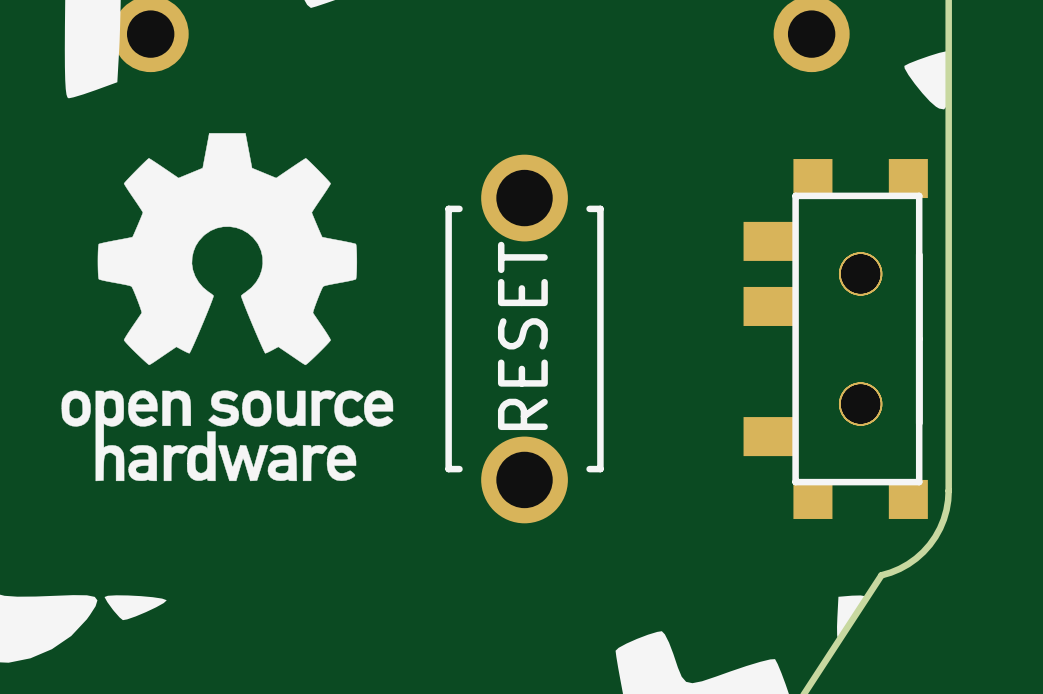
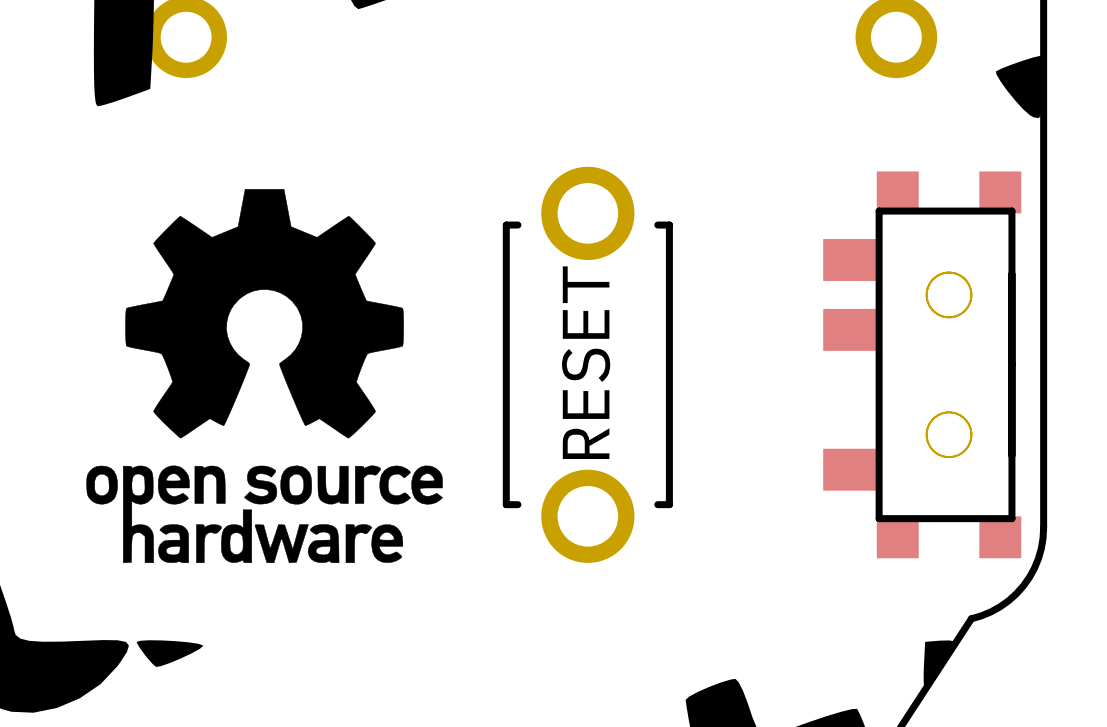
drawing position: (227, 307) -> (264, 376)

